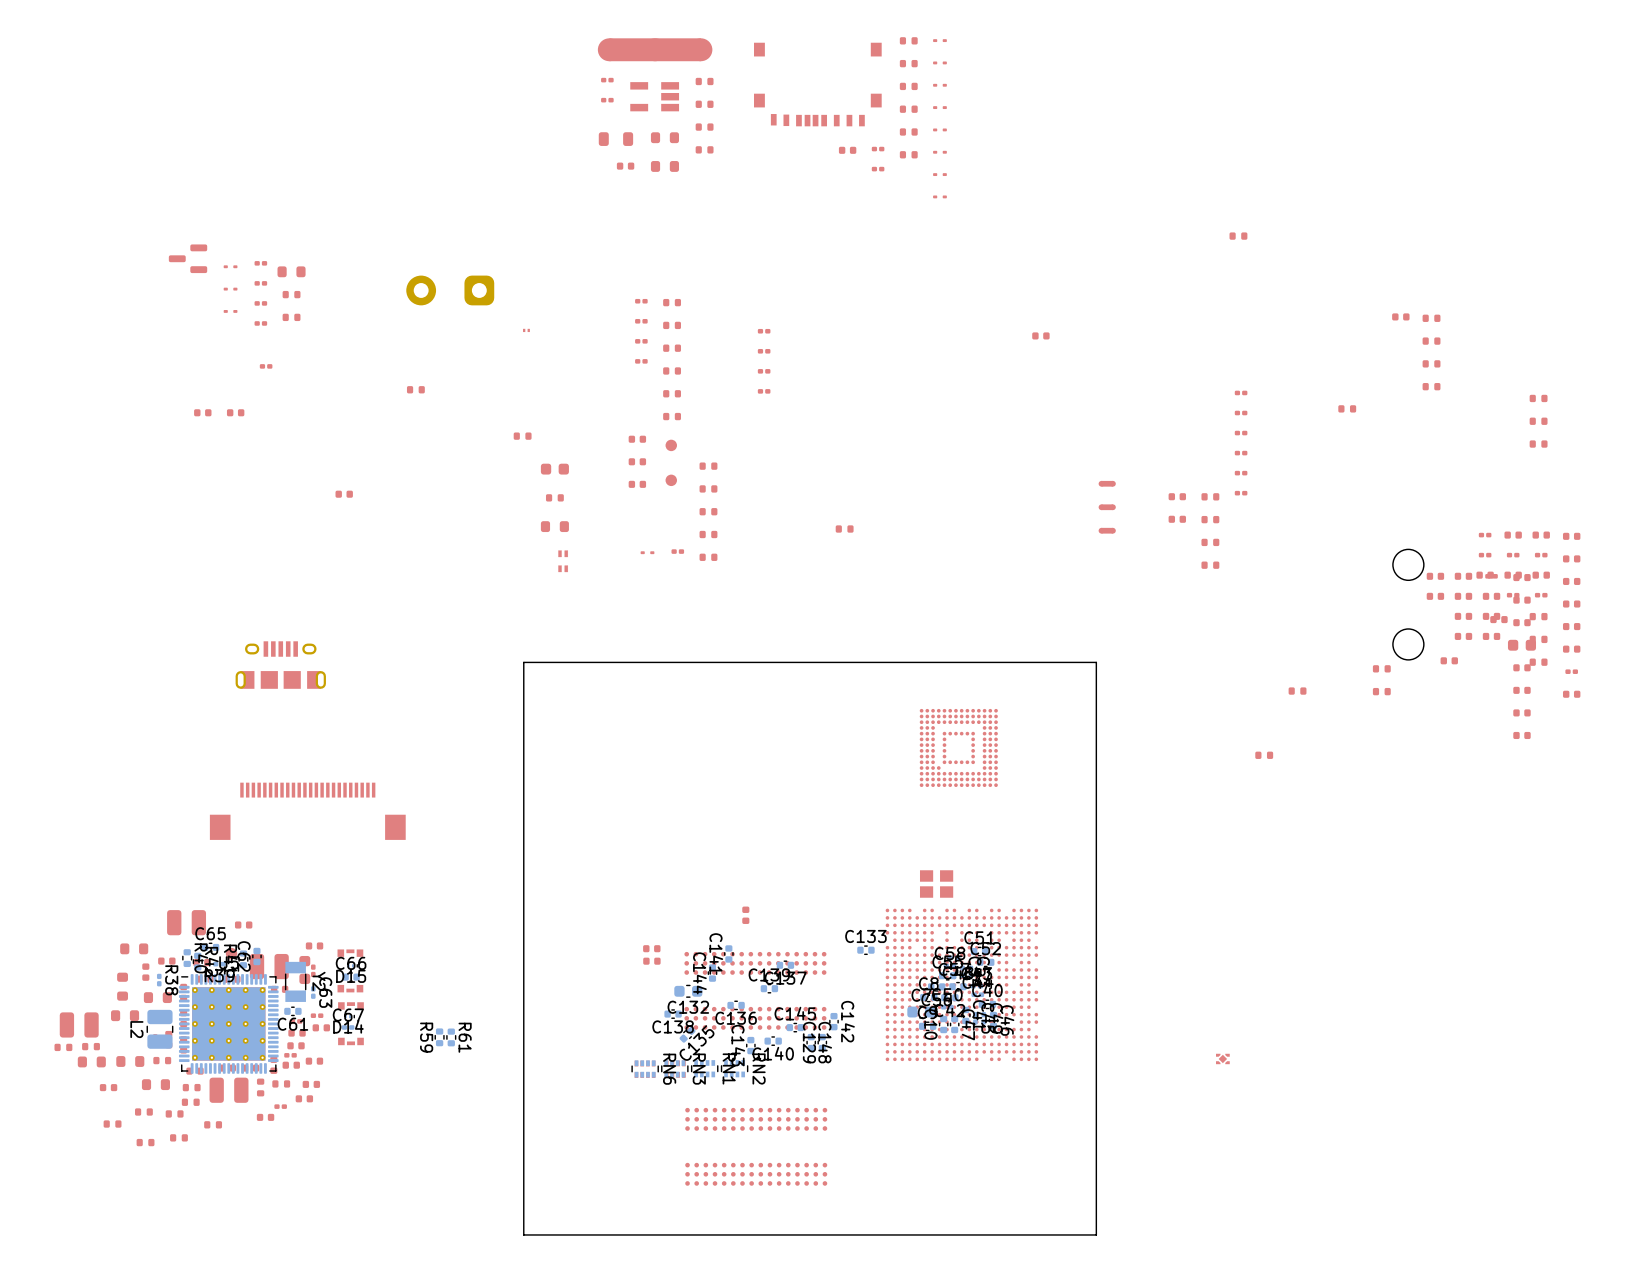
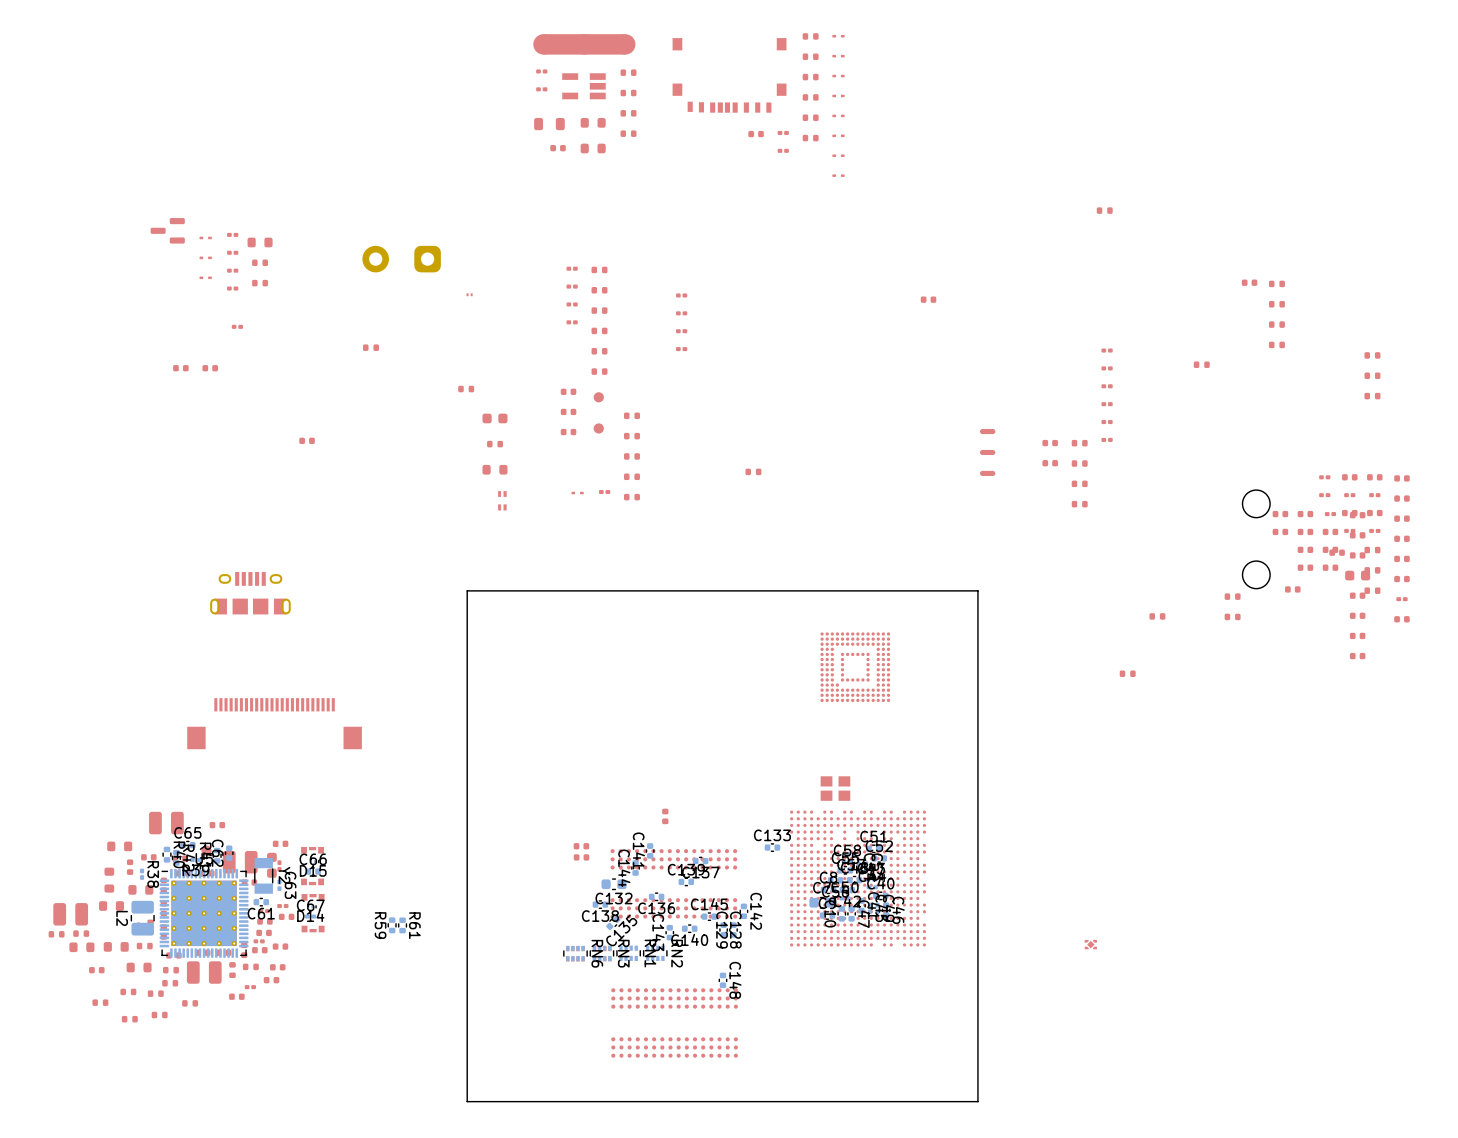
part: (1485, 575) -> none
C148 name: C148 (825, 1042) -> C128 (735, 930)
C148: none -> (722, 980)

